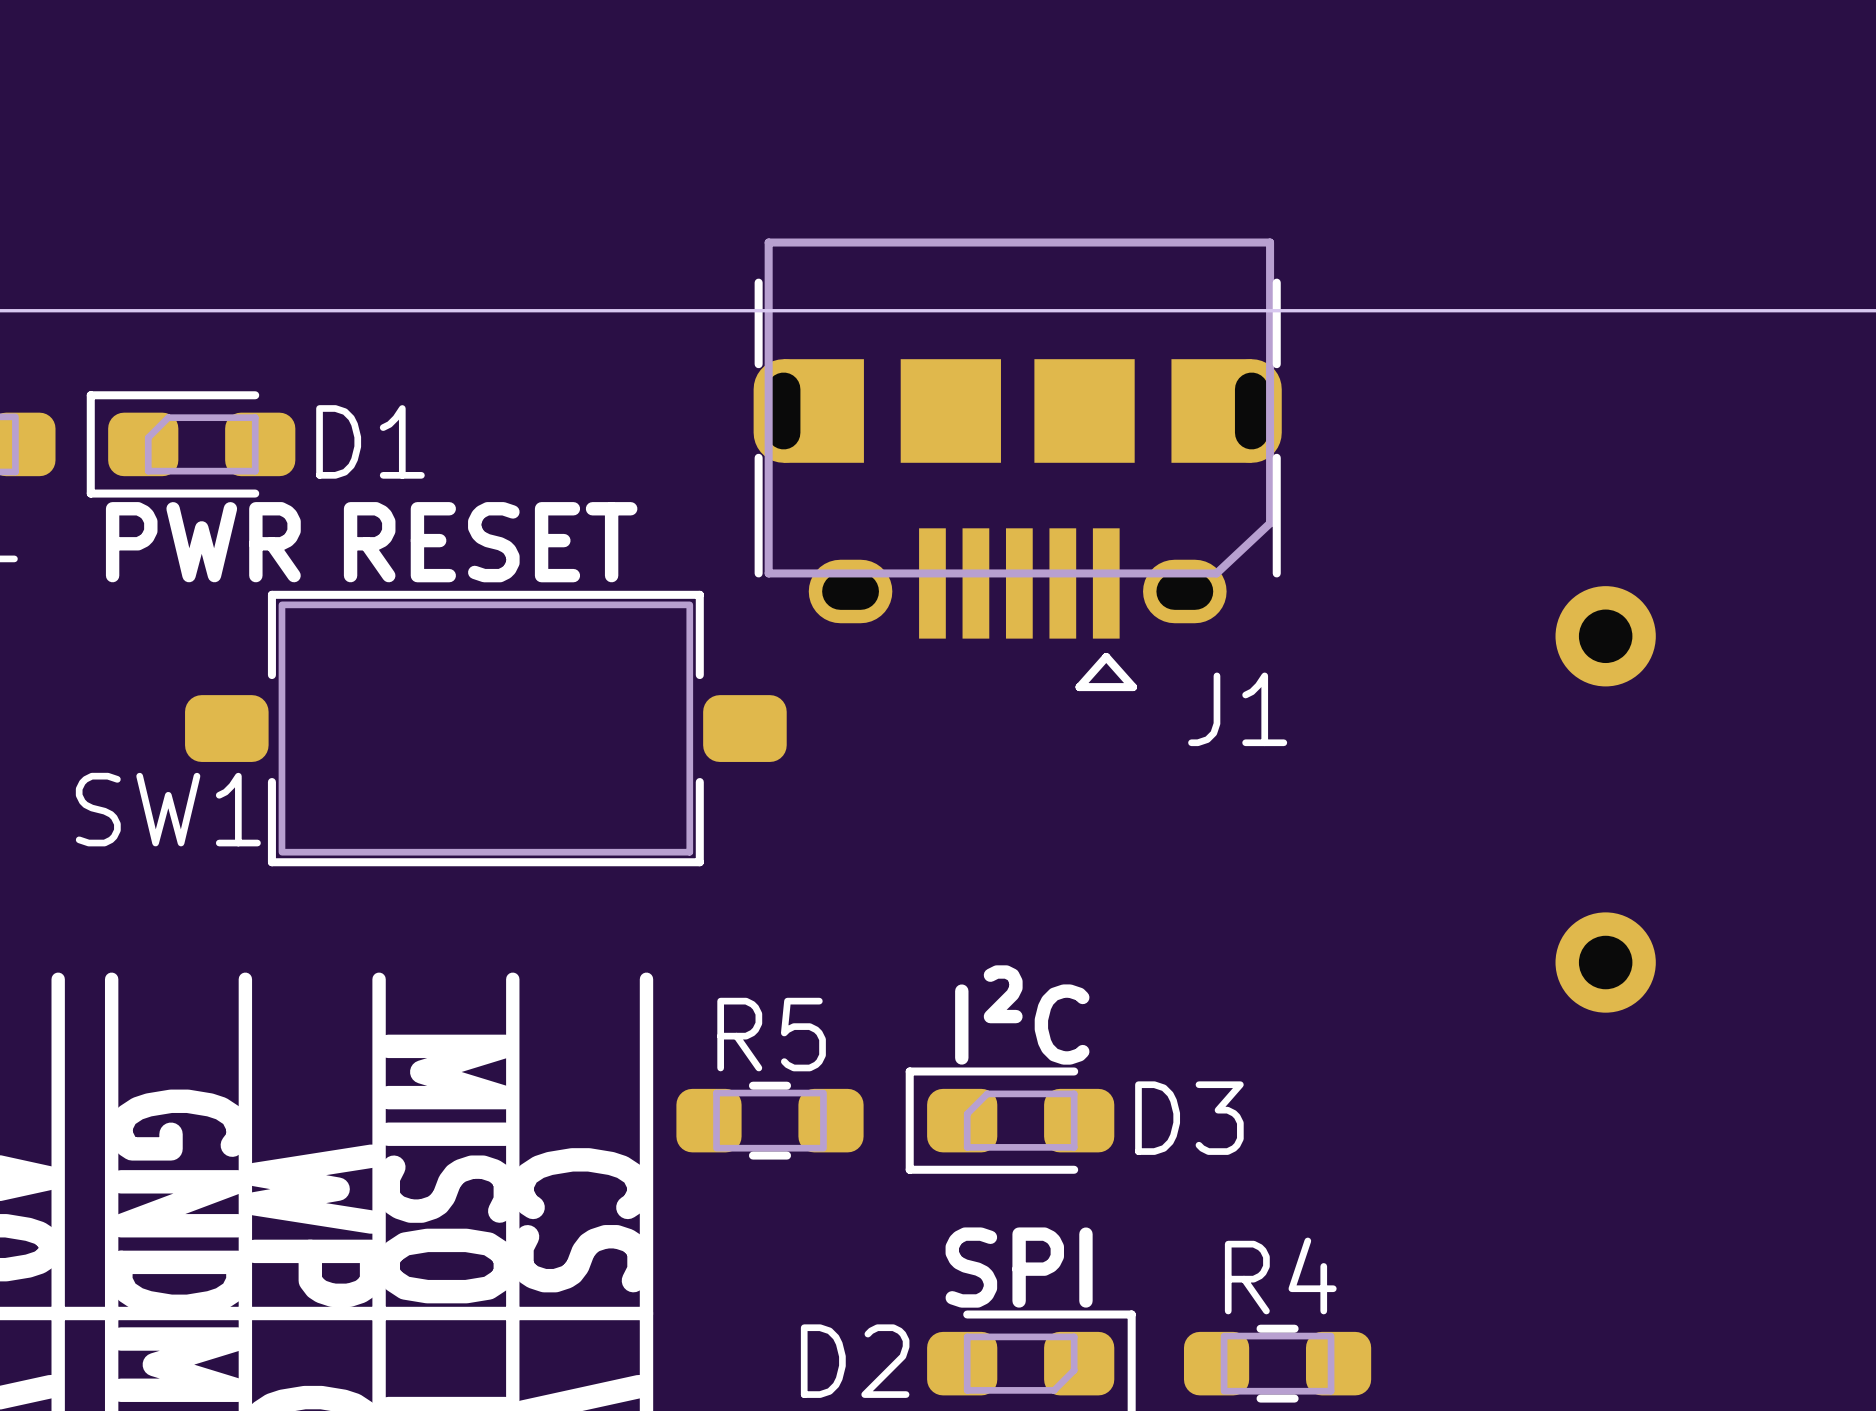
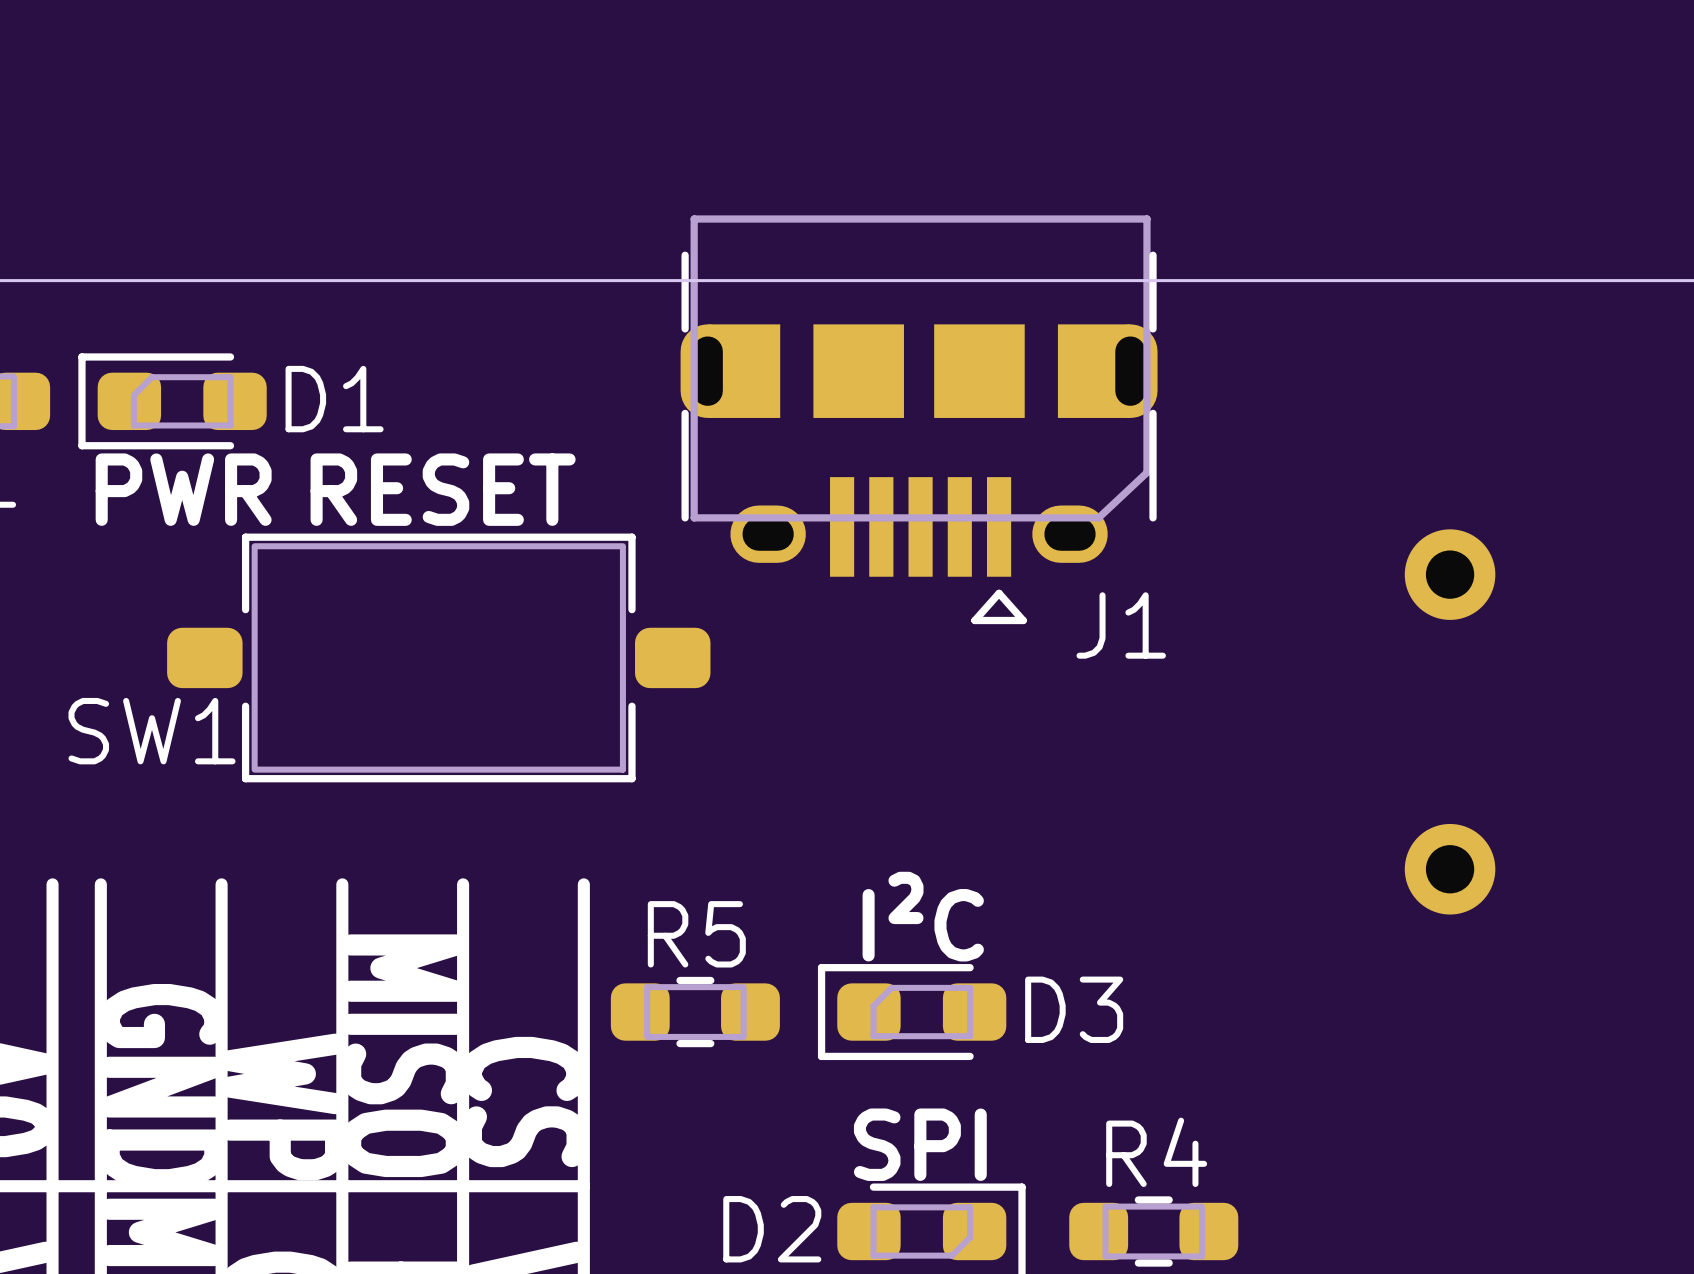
J1 name position: J1 (1237, 709) -> J1 (1121, 625)

